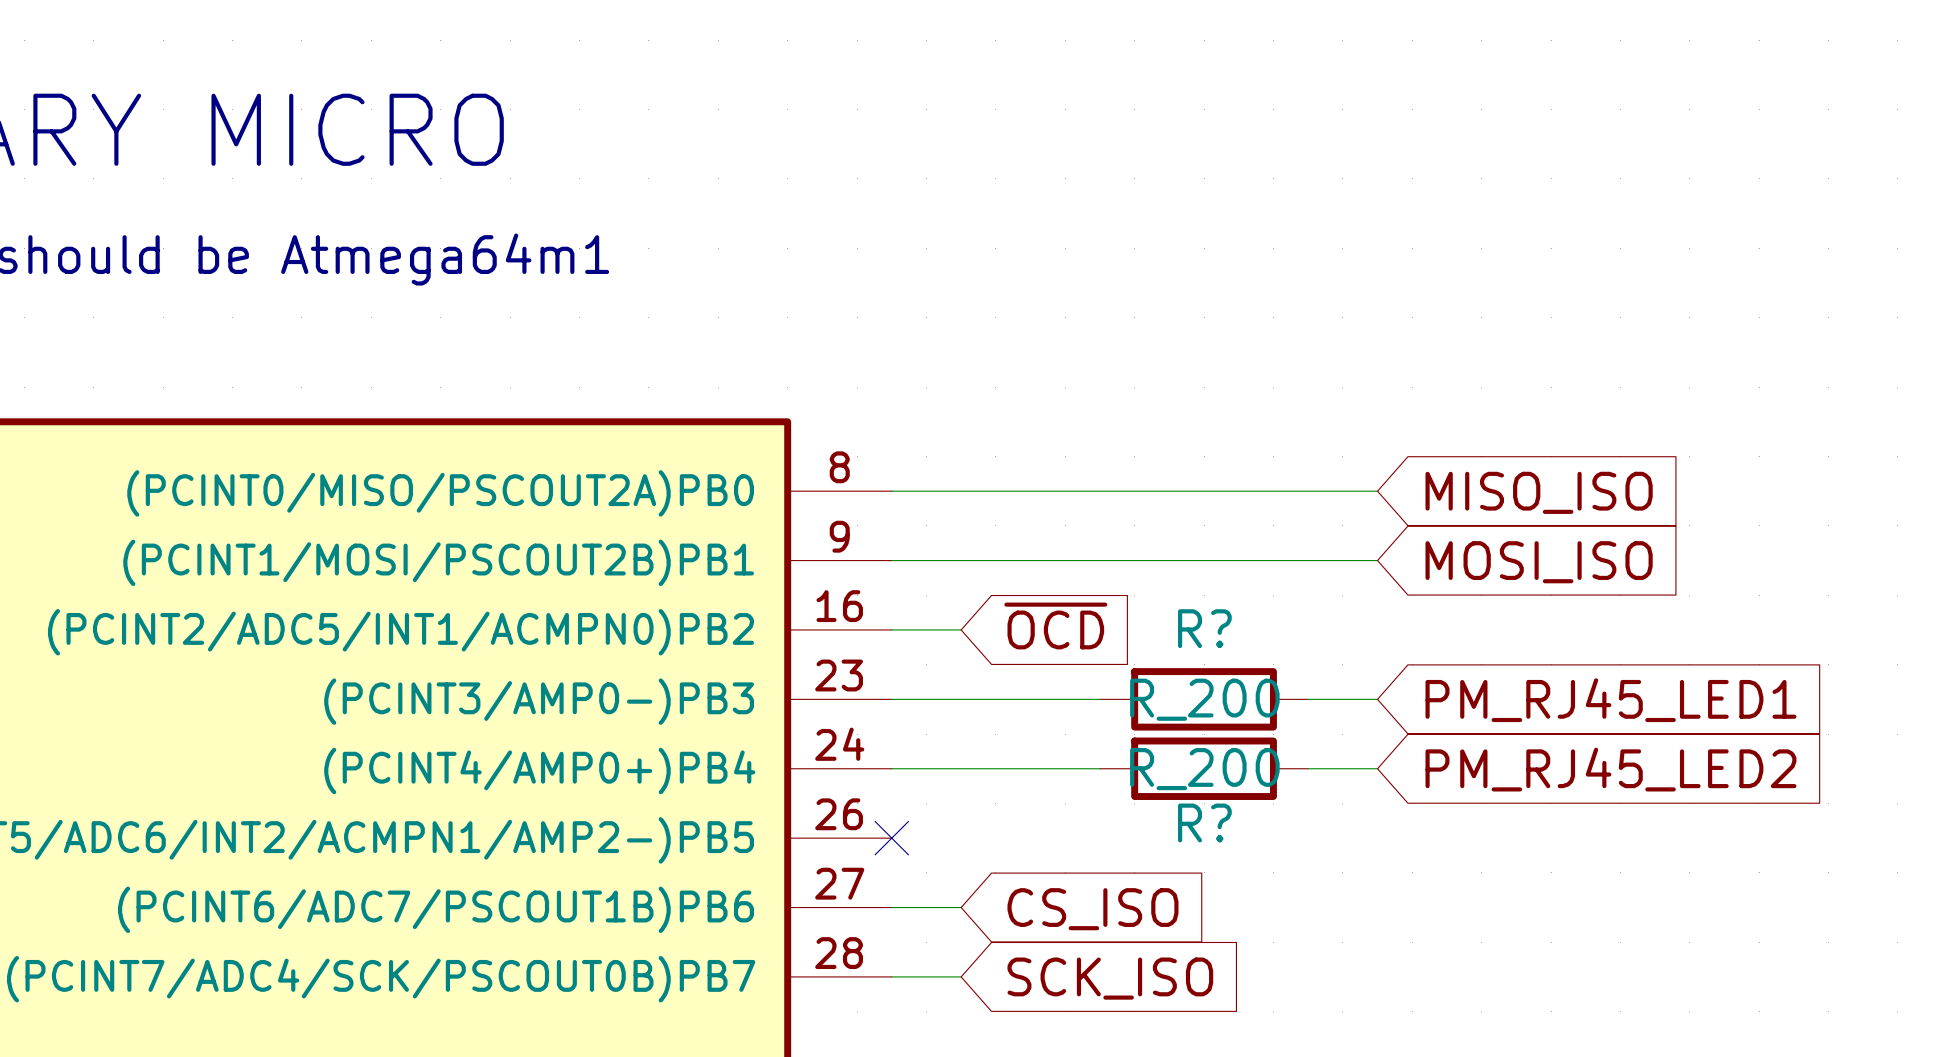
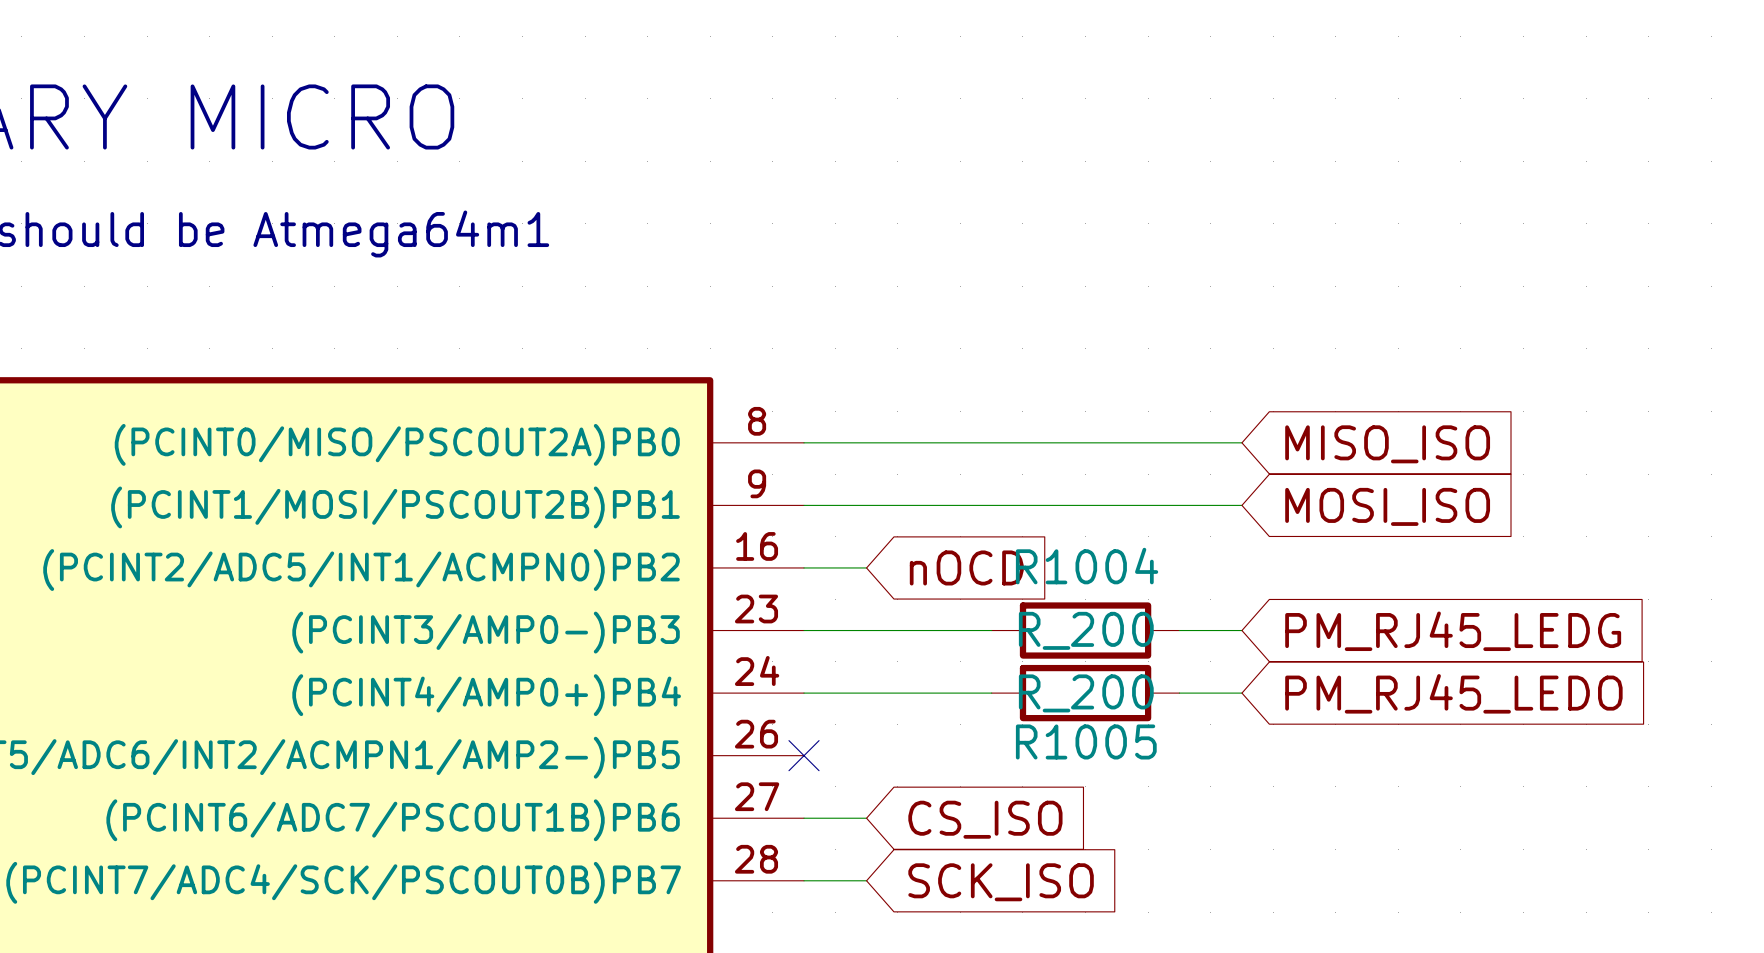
global label: ~{OCD} (1055, 625) -> nOCD (966, 567)
R? name: R? (1204, 628) -> R1004 (1087, 566)
global label: PM_RJ45_LED1 (1610, 700) -> PM_RJ45_LEDG (1453, 631)
global label: PM_RJ45_LED2 (1610, 769) -> PM_RJ45_LEDO (1453, 693)
R? name: R? (1204, 822) -> R1005 (1086, 741)

